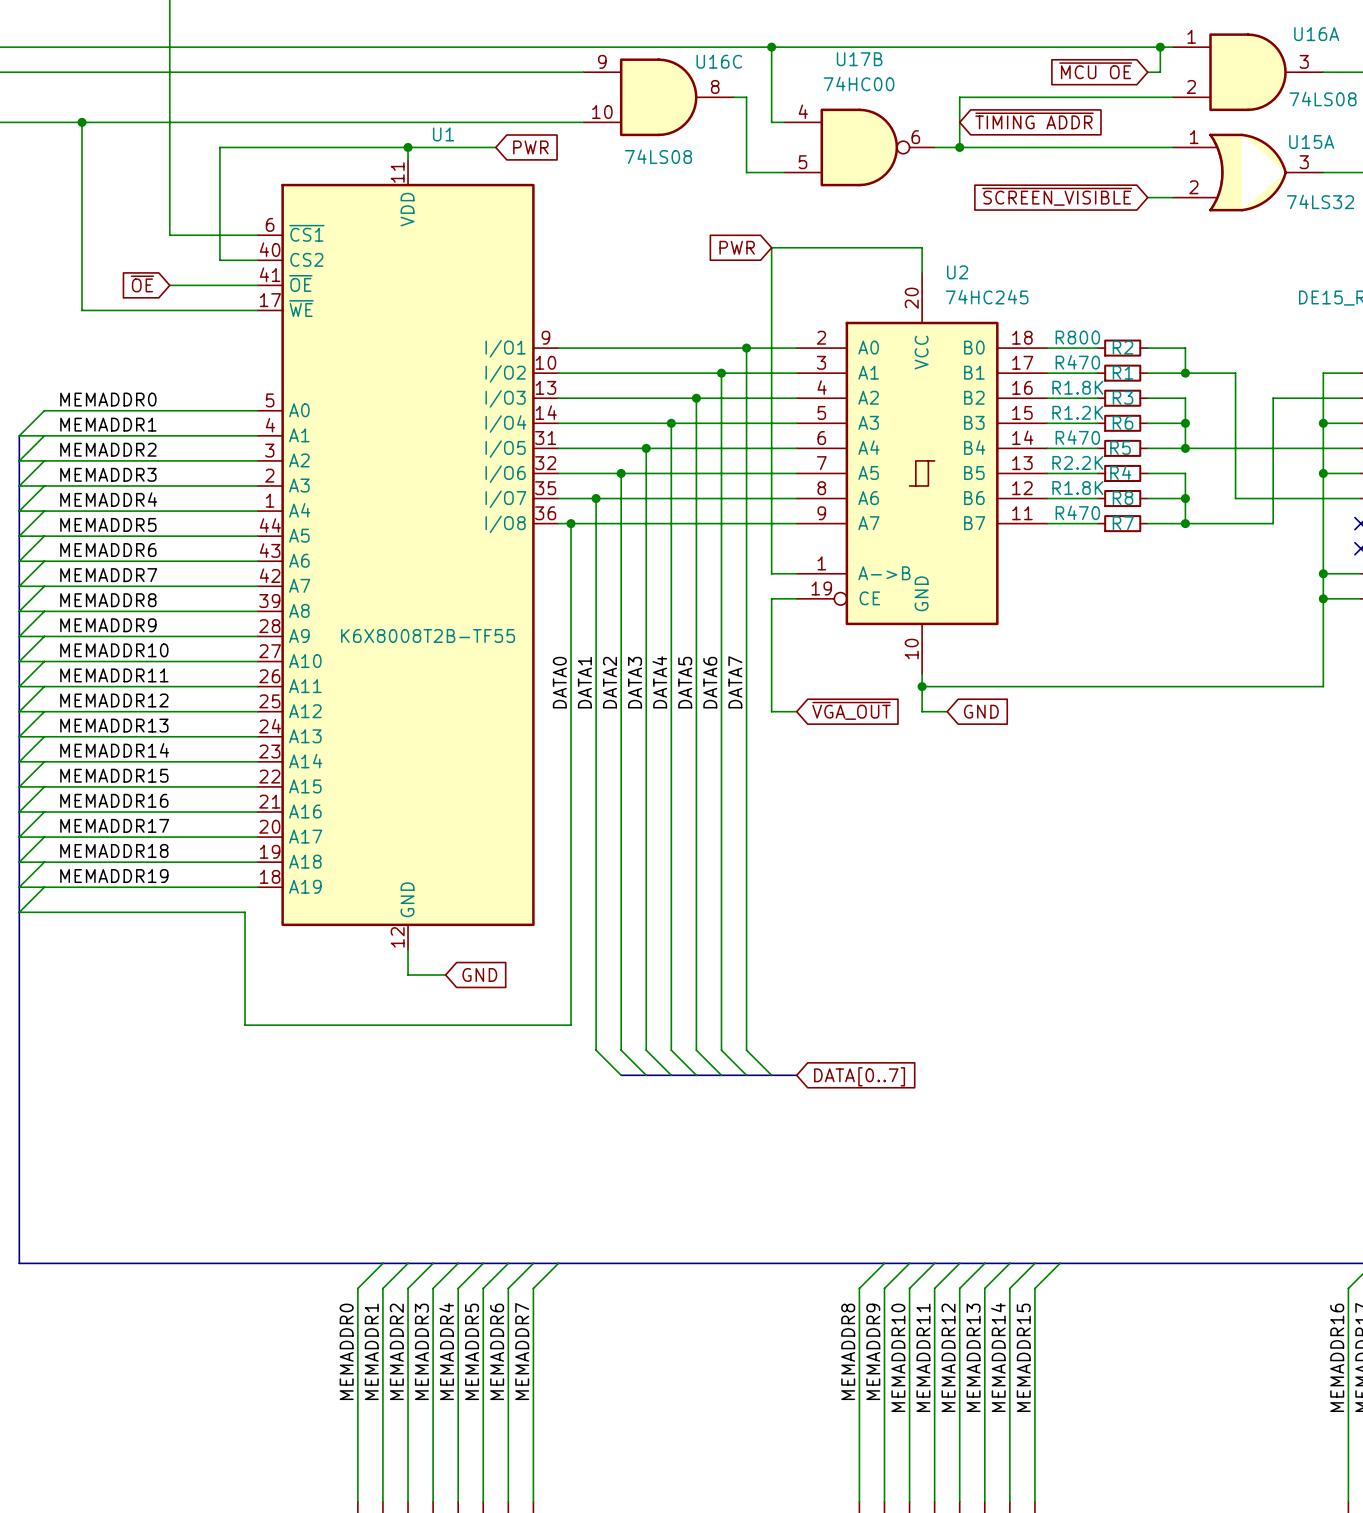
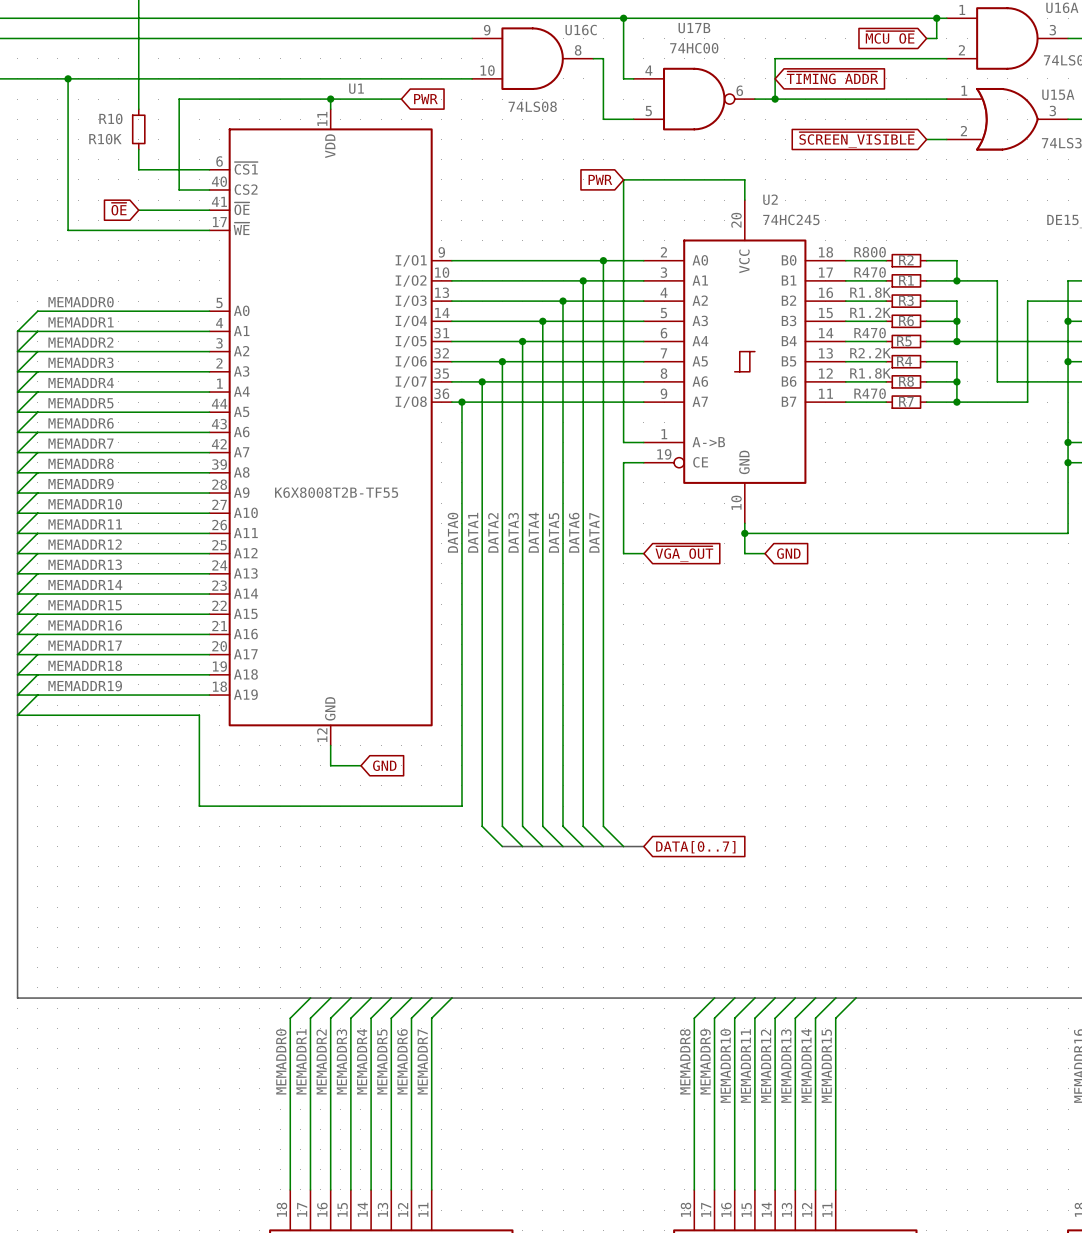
wire: (169, 159) (169, 210) -> none
R10: none -> R10K (138, 129)

